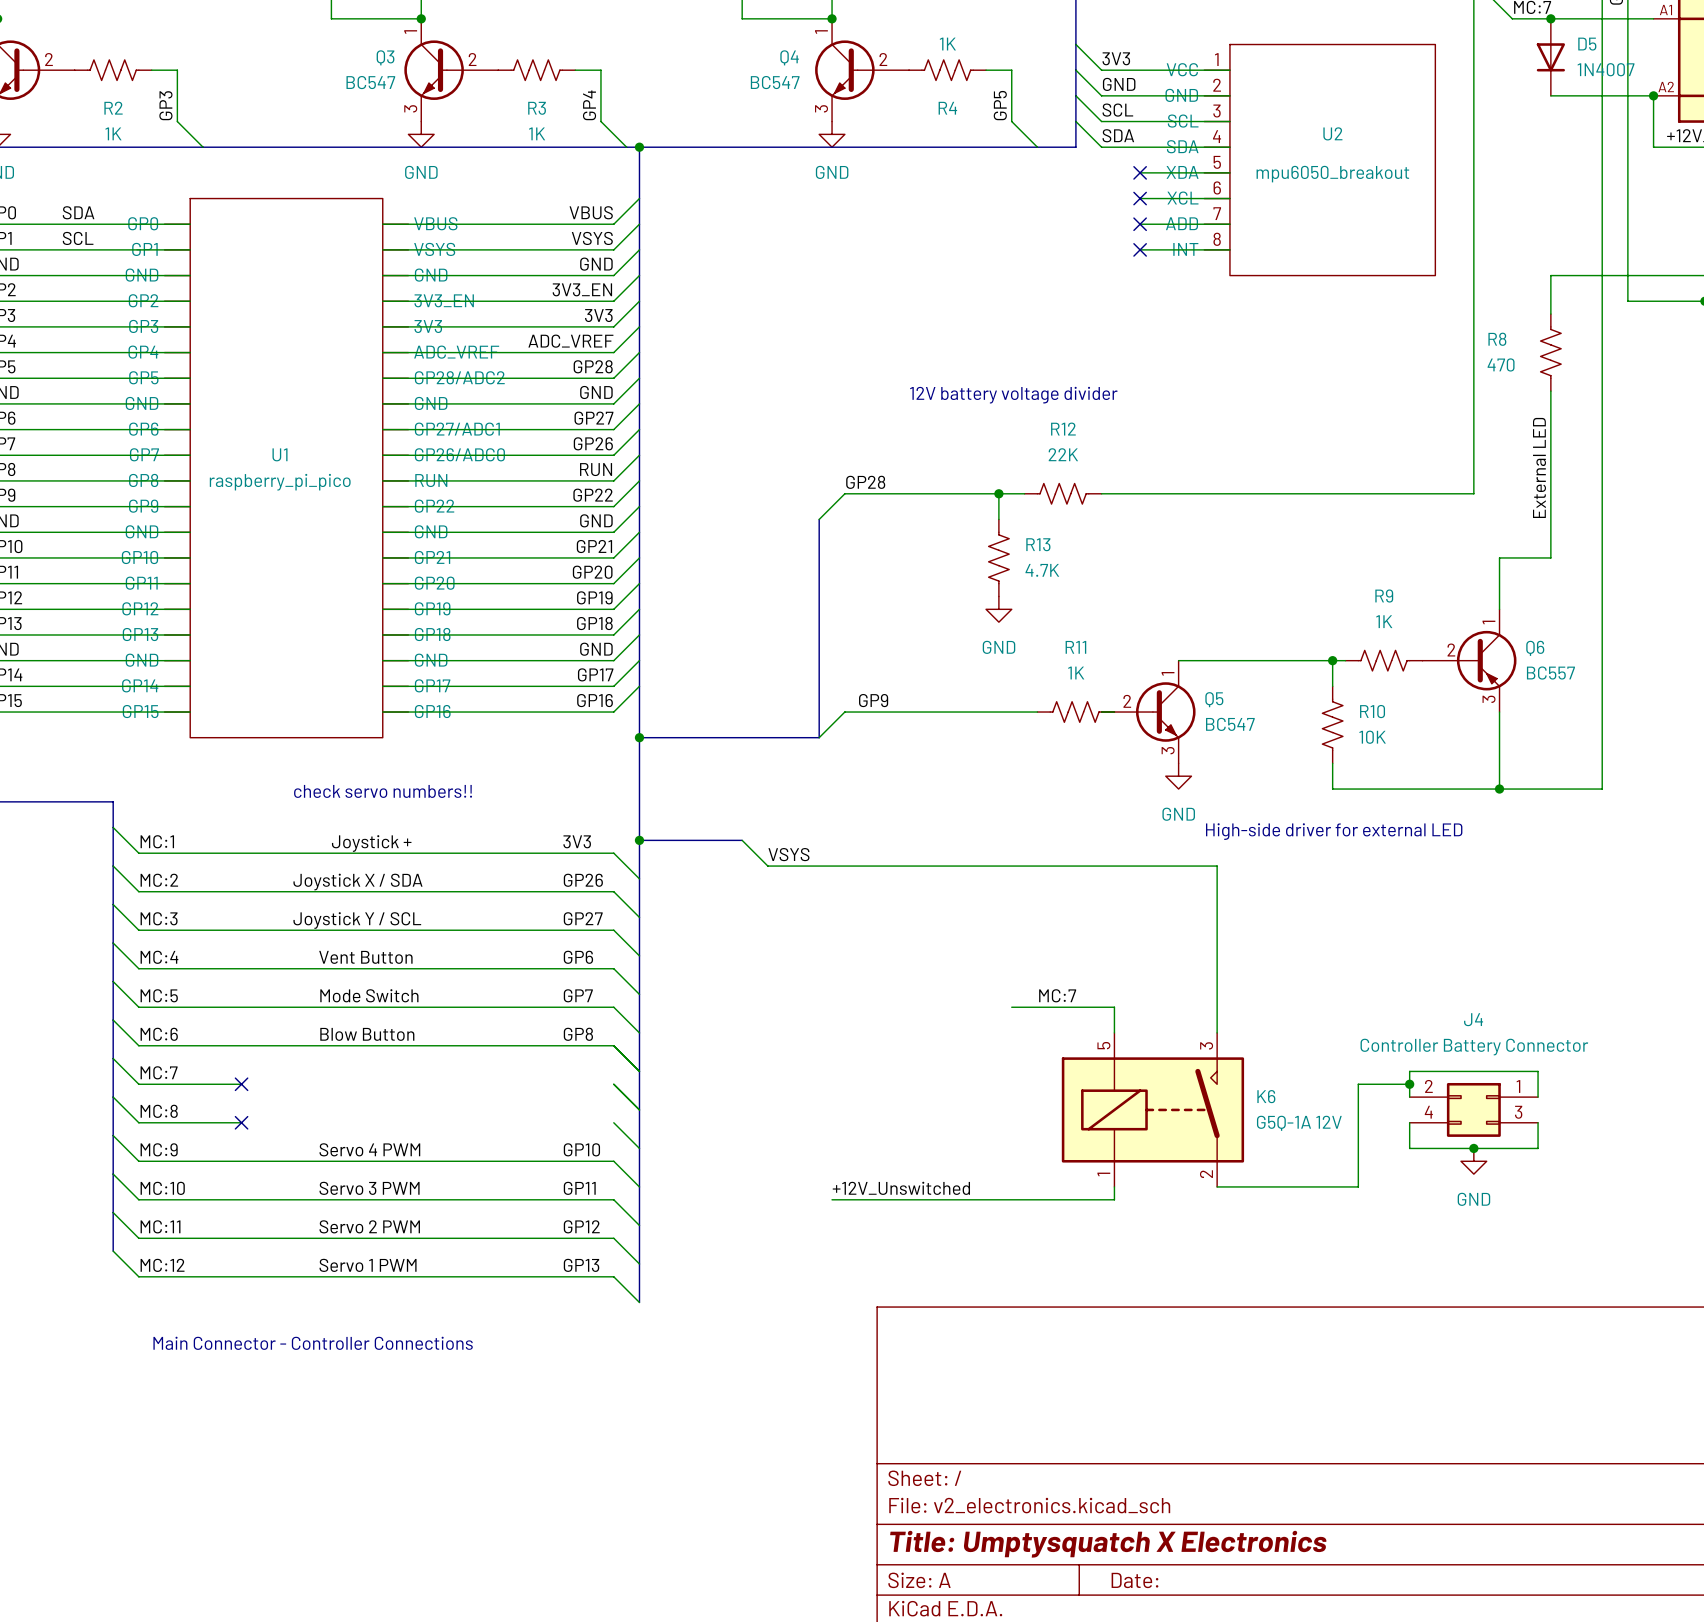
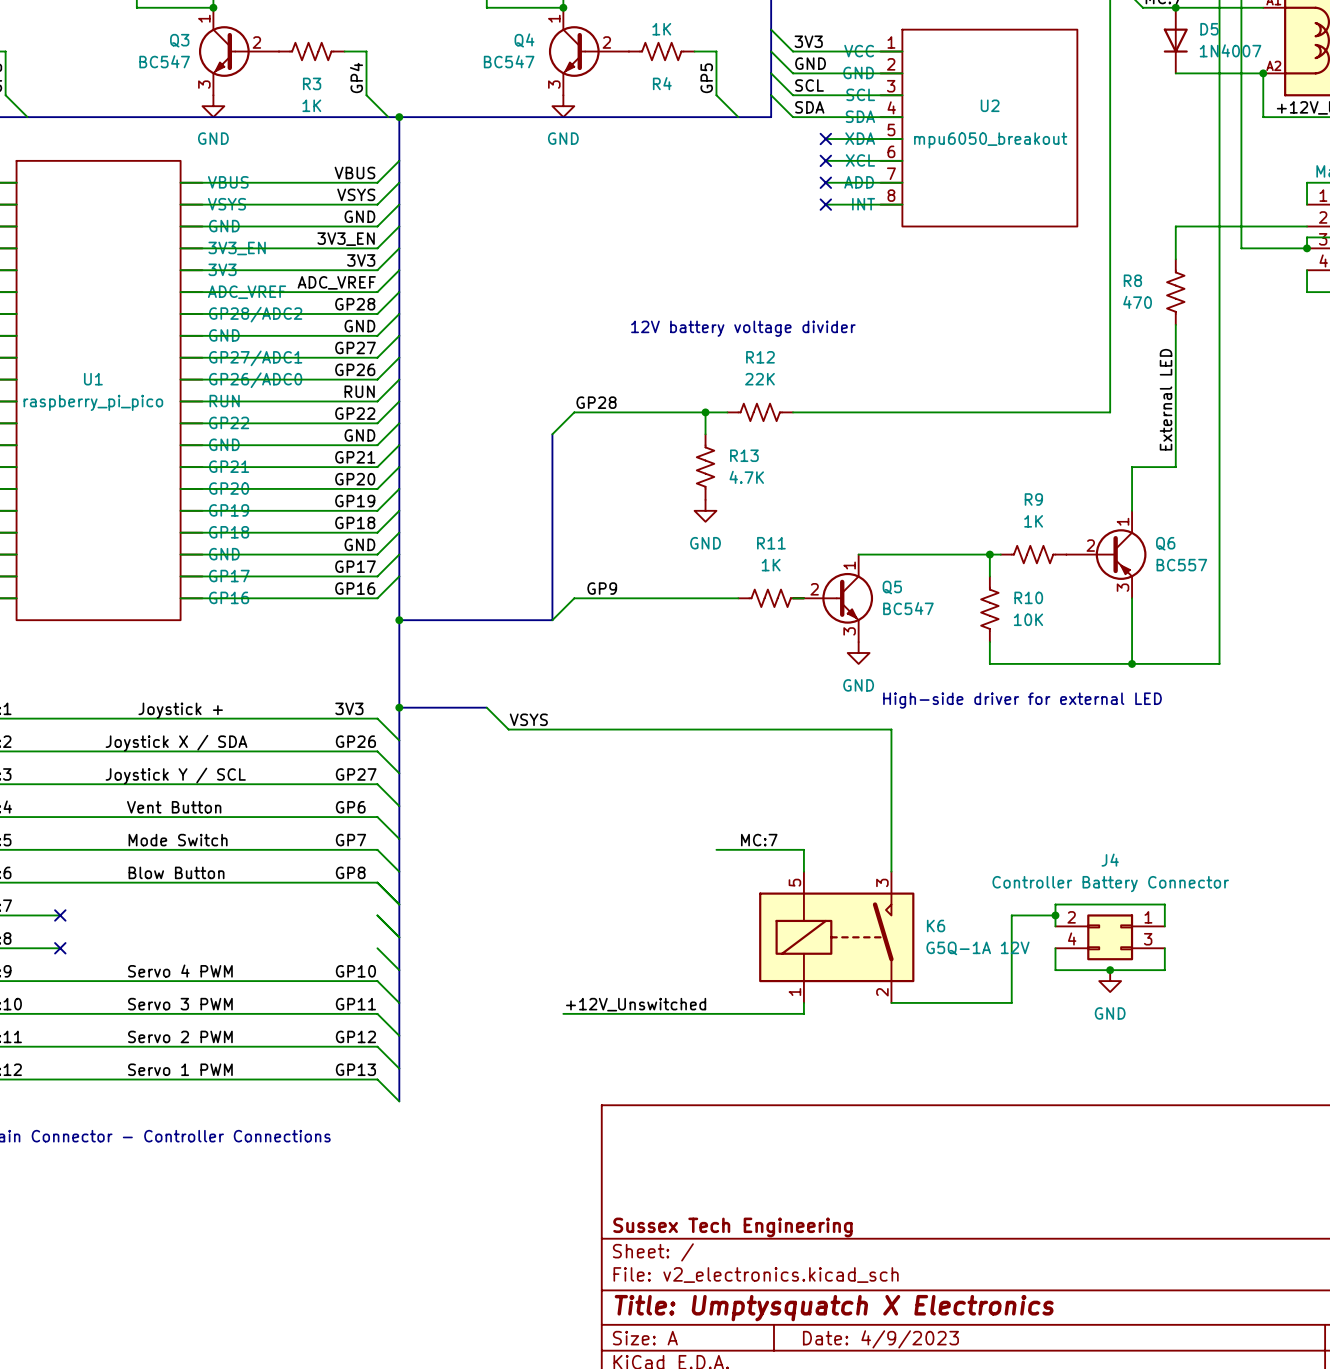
text: check servo numbers!! (383, 791) -> none
title block: none -> Sussex Tech Engineering (732, 1227)
title block: Date: (1134, 1580) -> Date: 4/9/2023 (880, 1339)

